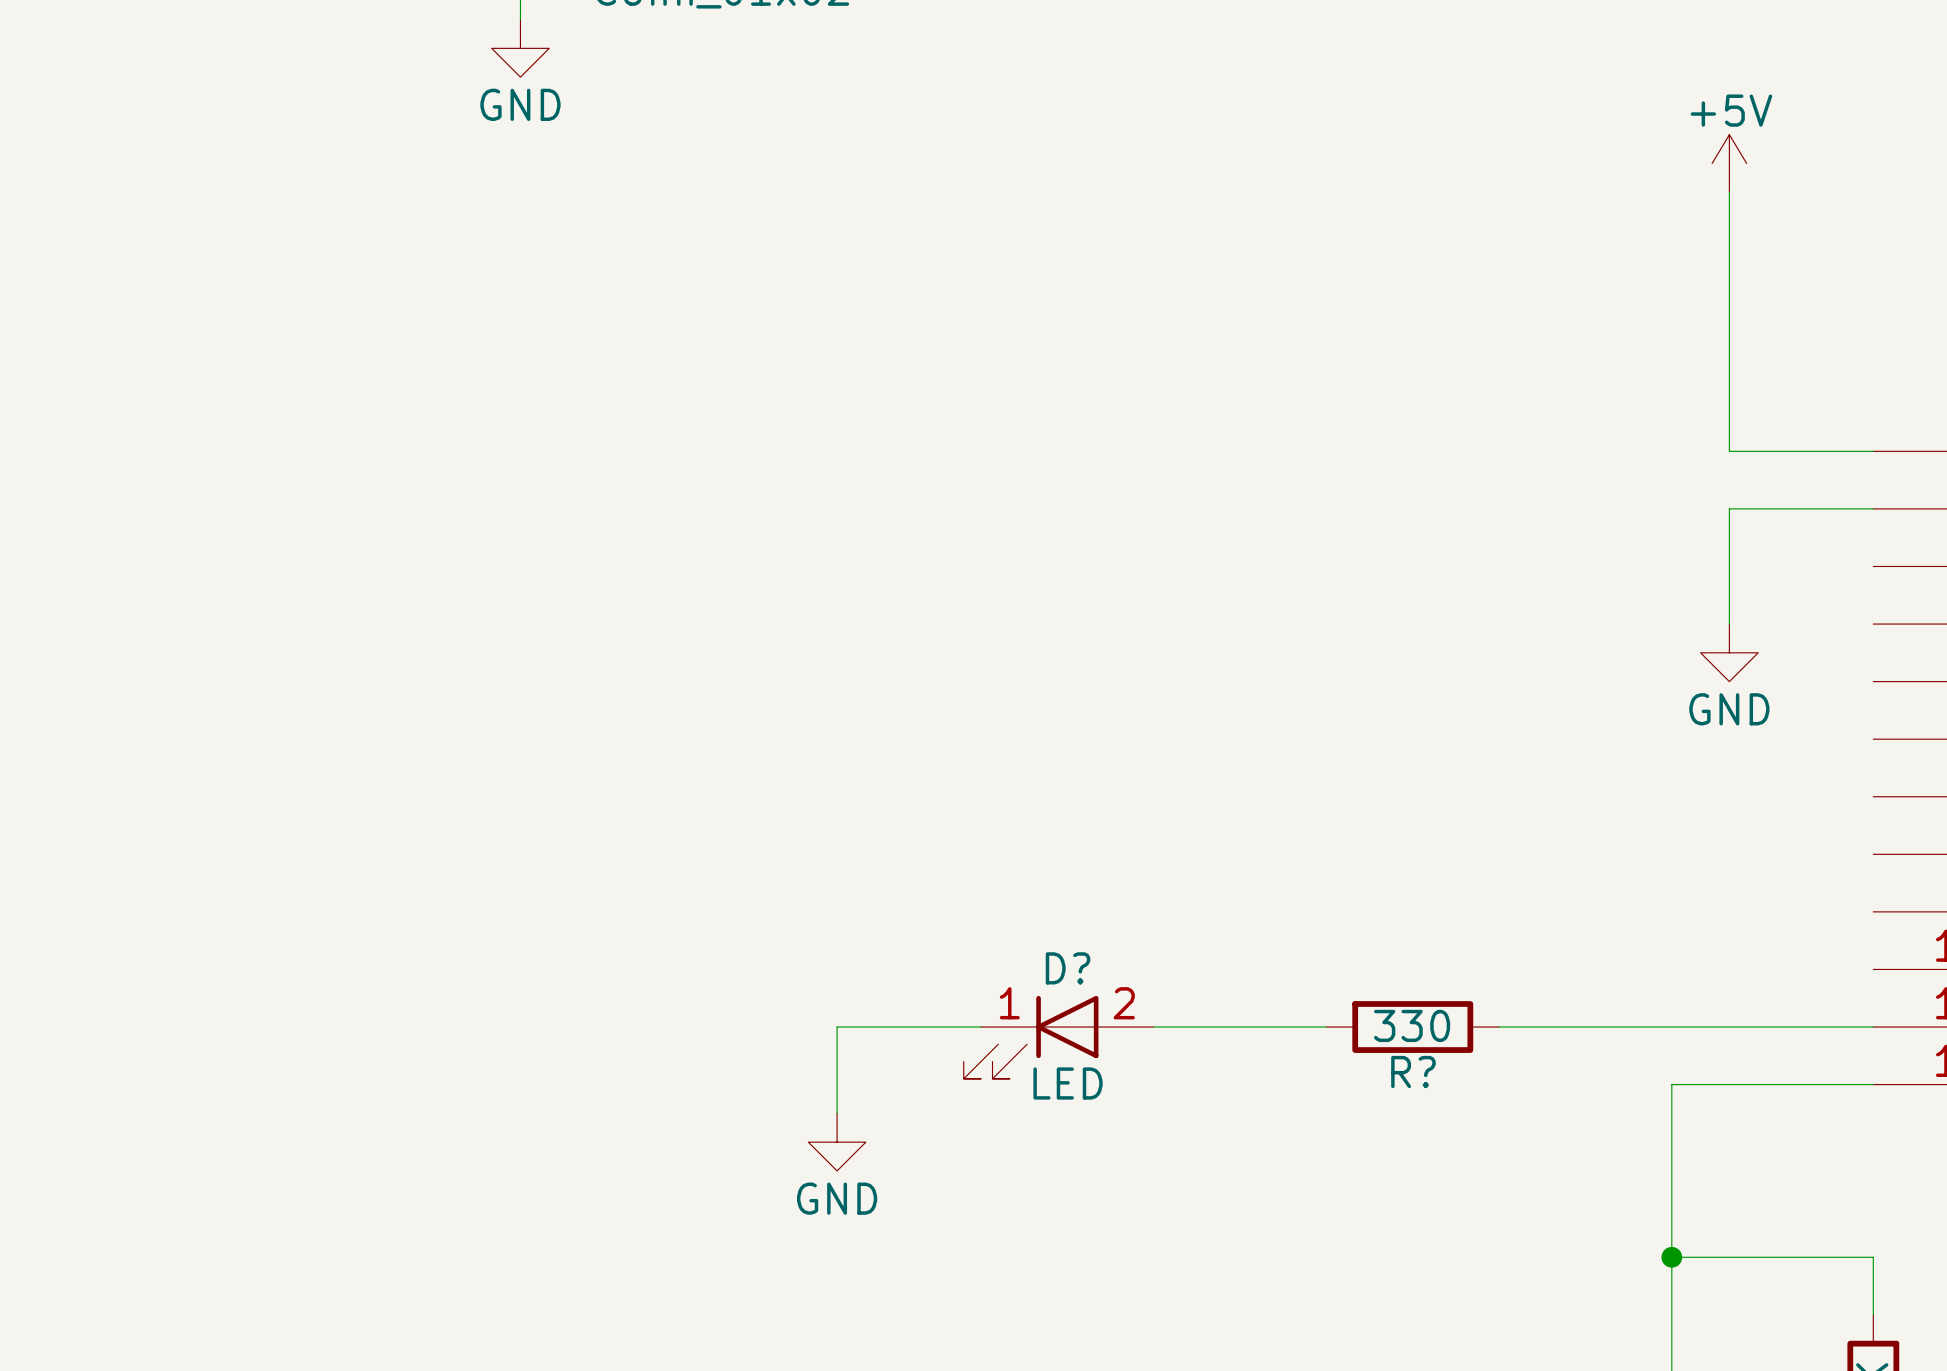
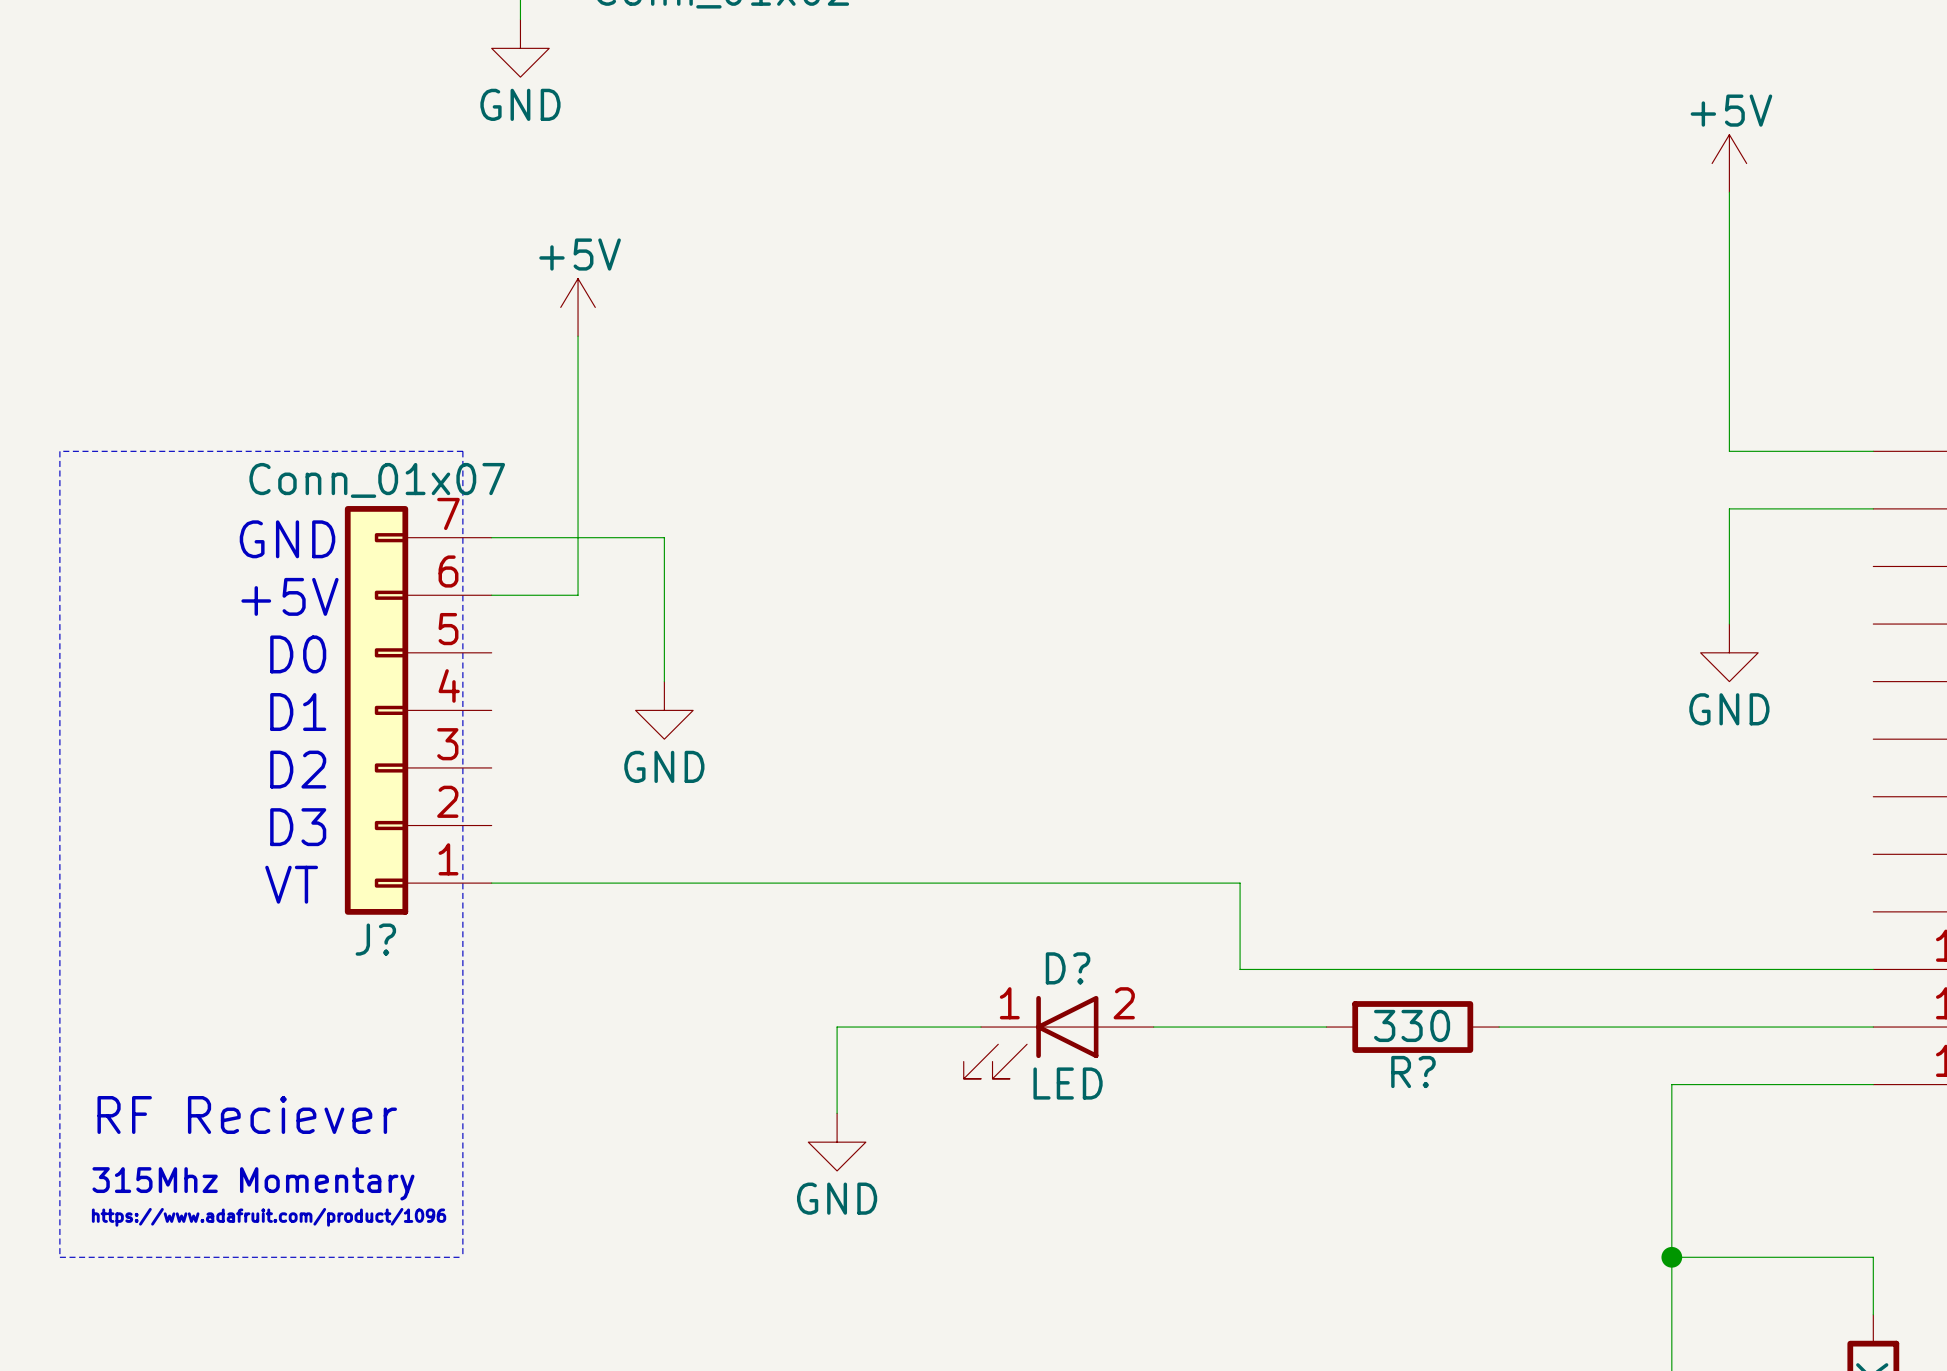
power symbol: none -> +5V (578, 307)
wire: none -> (578, 336) (578, 595) (491, 595)
line: none -> (59, 451) (462, 451) (462, 1257) (59, 1257) (59, 451)
wire: none -> (491, 537) (664, 537) (664, 681)
text: none -> GND (287, 539)
text: none -> +5V (289, 596)
text: none -> D0 (298, 654)
J?: none -> Conn_01x07 (418, 710)
power symbol: none -> GND (664, 710)
text: none -> D1 (298, 712)
text: none -> D2 (298, 769)
text: none -> D3 (298, 827)
wire: none -> (491, 883) (1240, 883) (1240, 969) (1873, 969)
text: none -> VT (291, 884)
text: none -> RF Reciever (247, 1114)
text: none -> 315Mhz Momentary (253, 1183)
text: none -> https://www.adafruit.com/product/1096 (269, 1217)

